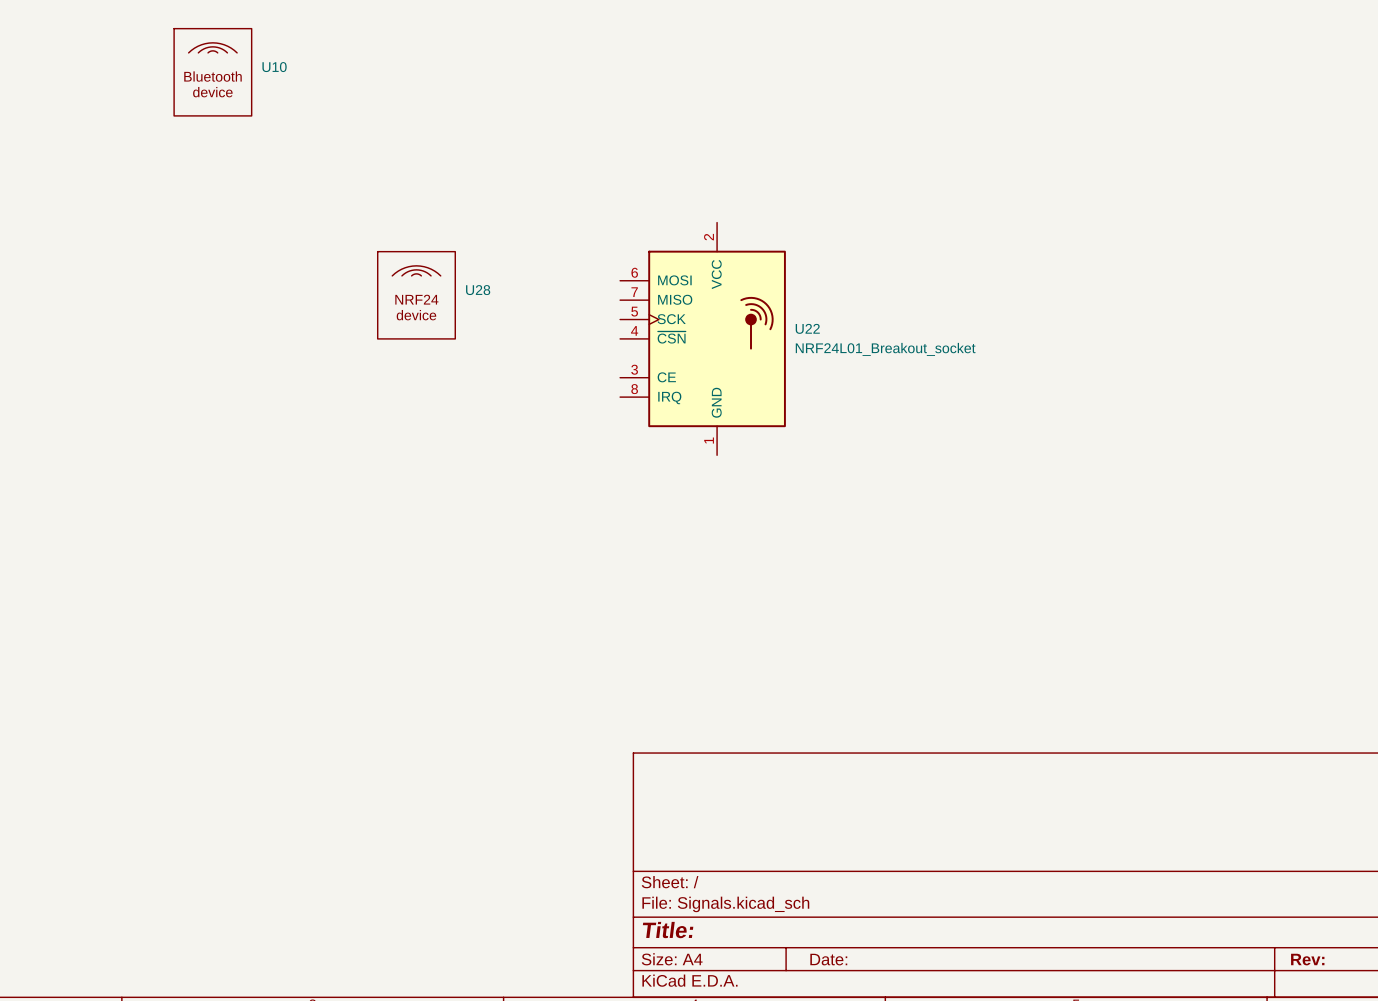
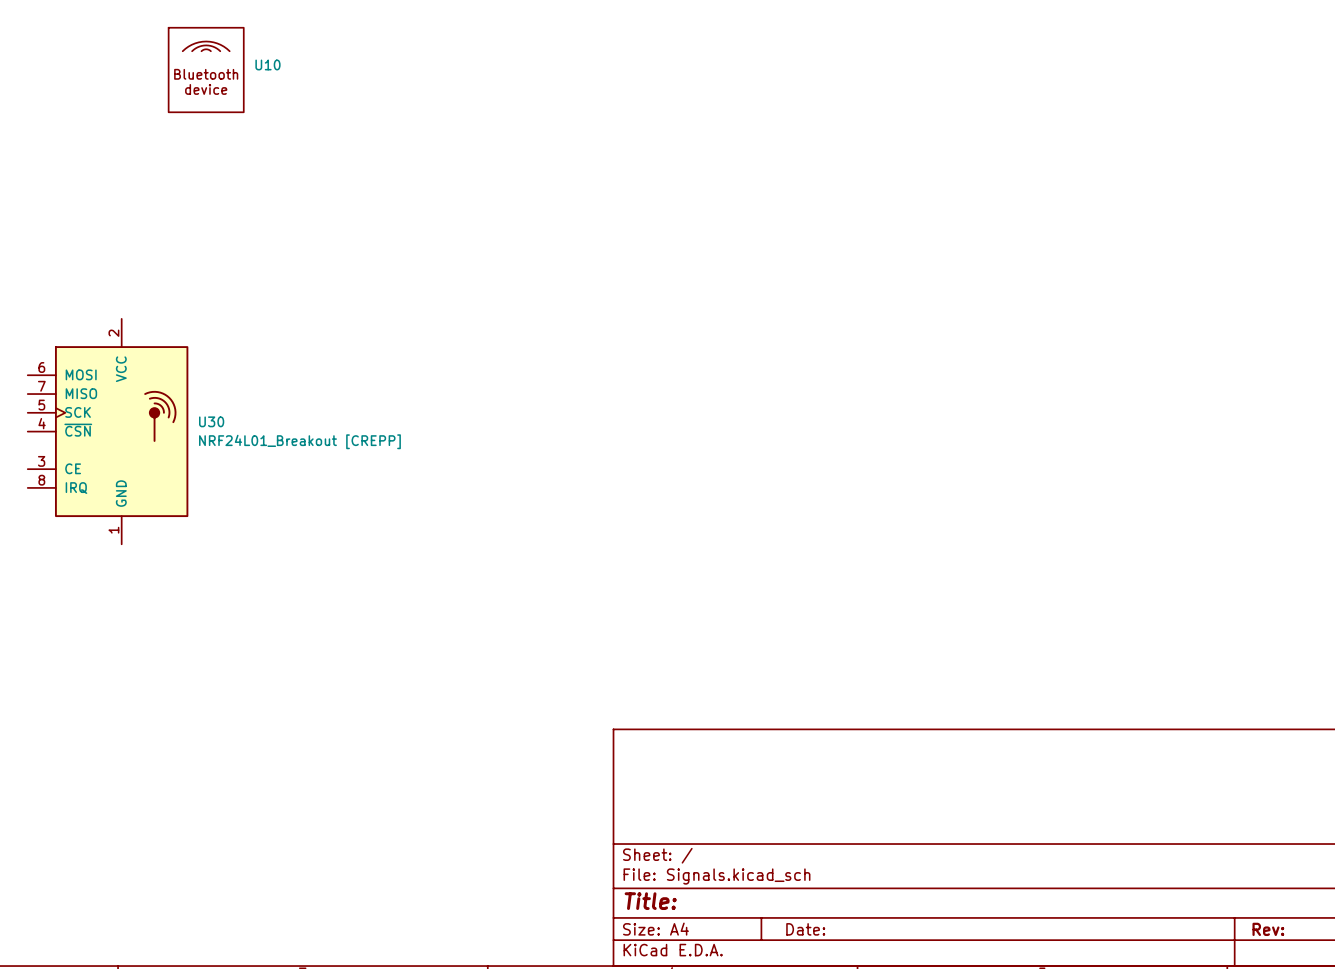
U28: (416, 295) -> none
U22: NRF24L01_Breakout_socket (703, 338) -> none
U30: none -> NRF24L01_Breakout [CREPP] (108, 431)

